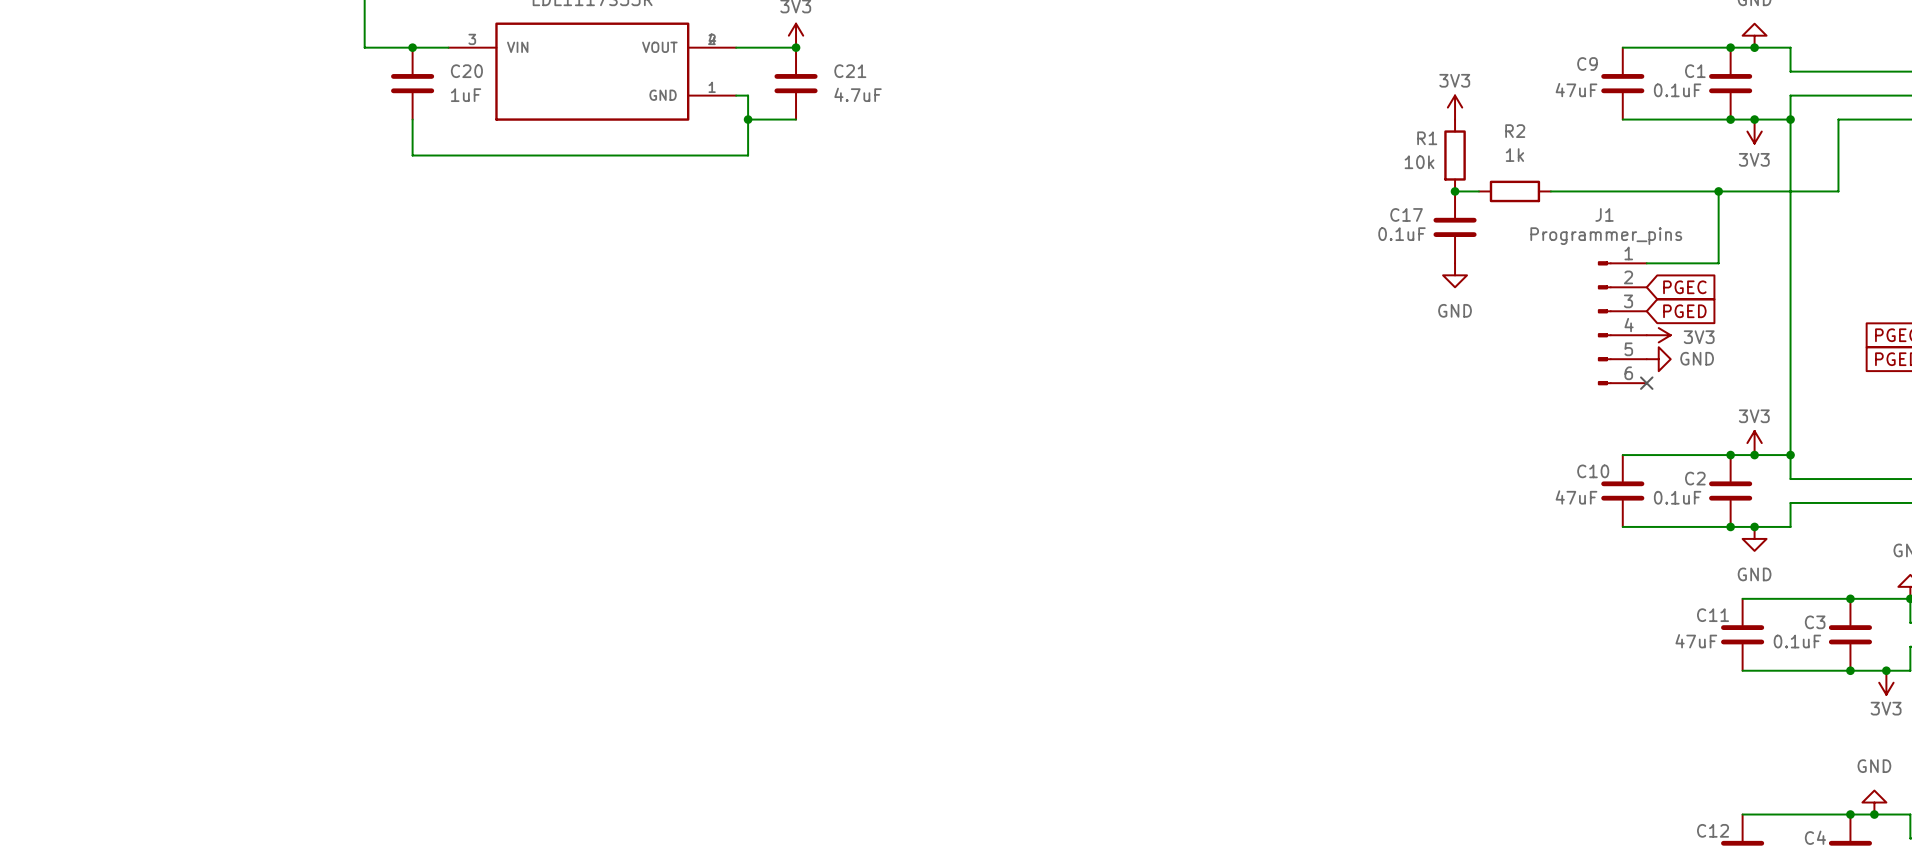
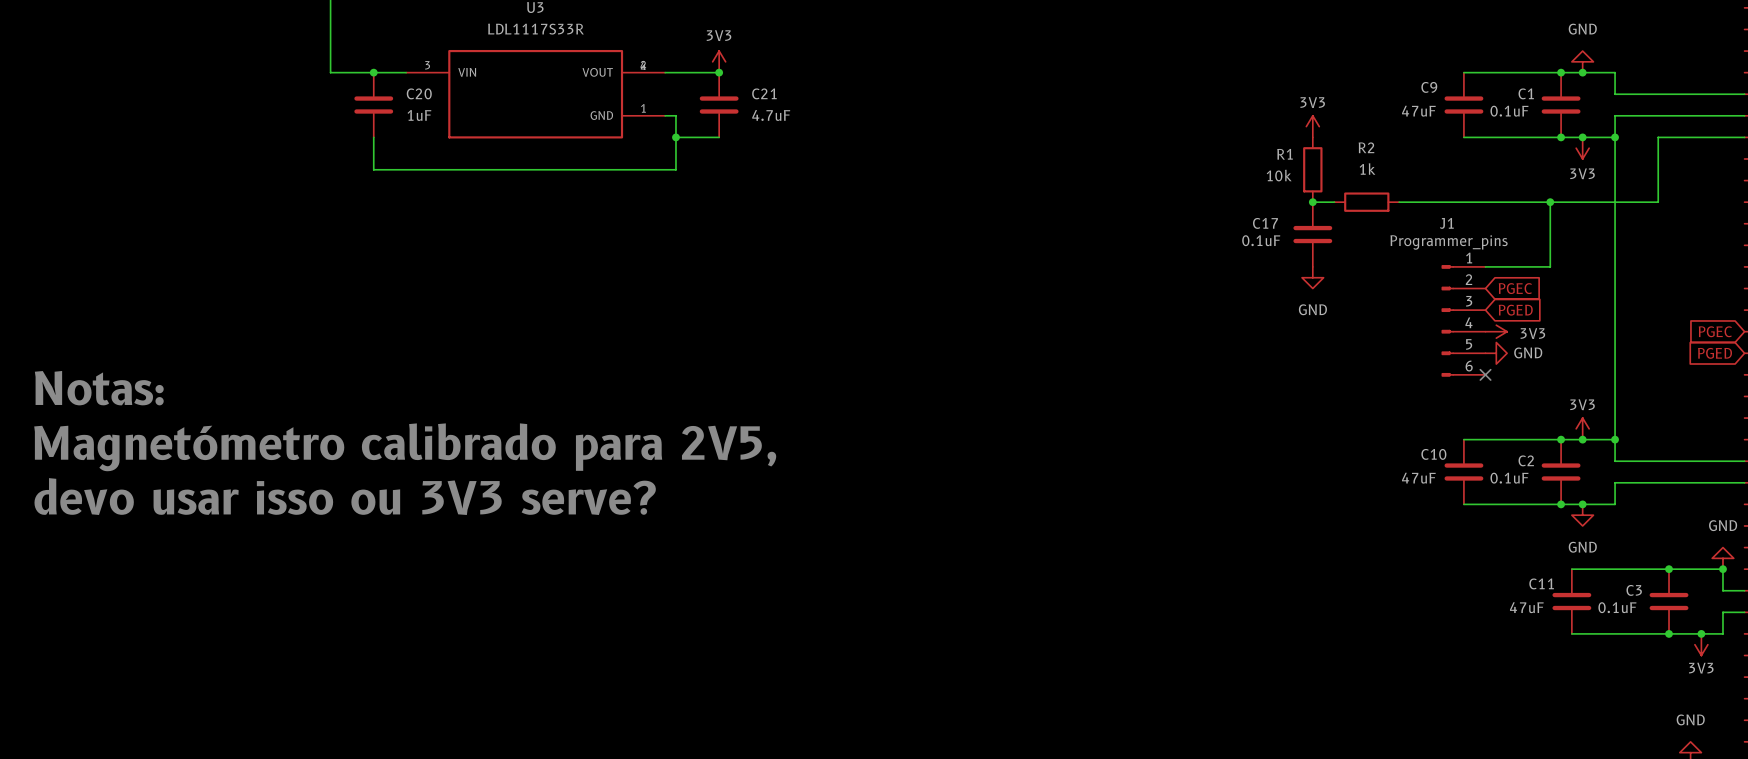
text: none -> Notas: (99, 388)
text: none -> Magnetómetro calibrado para 2V5, (405, 447)
text: none -> devo usar isso ou 3V3 serve? (345, 496)

